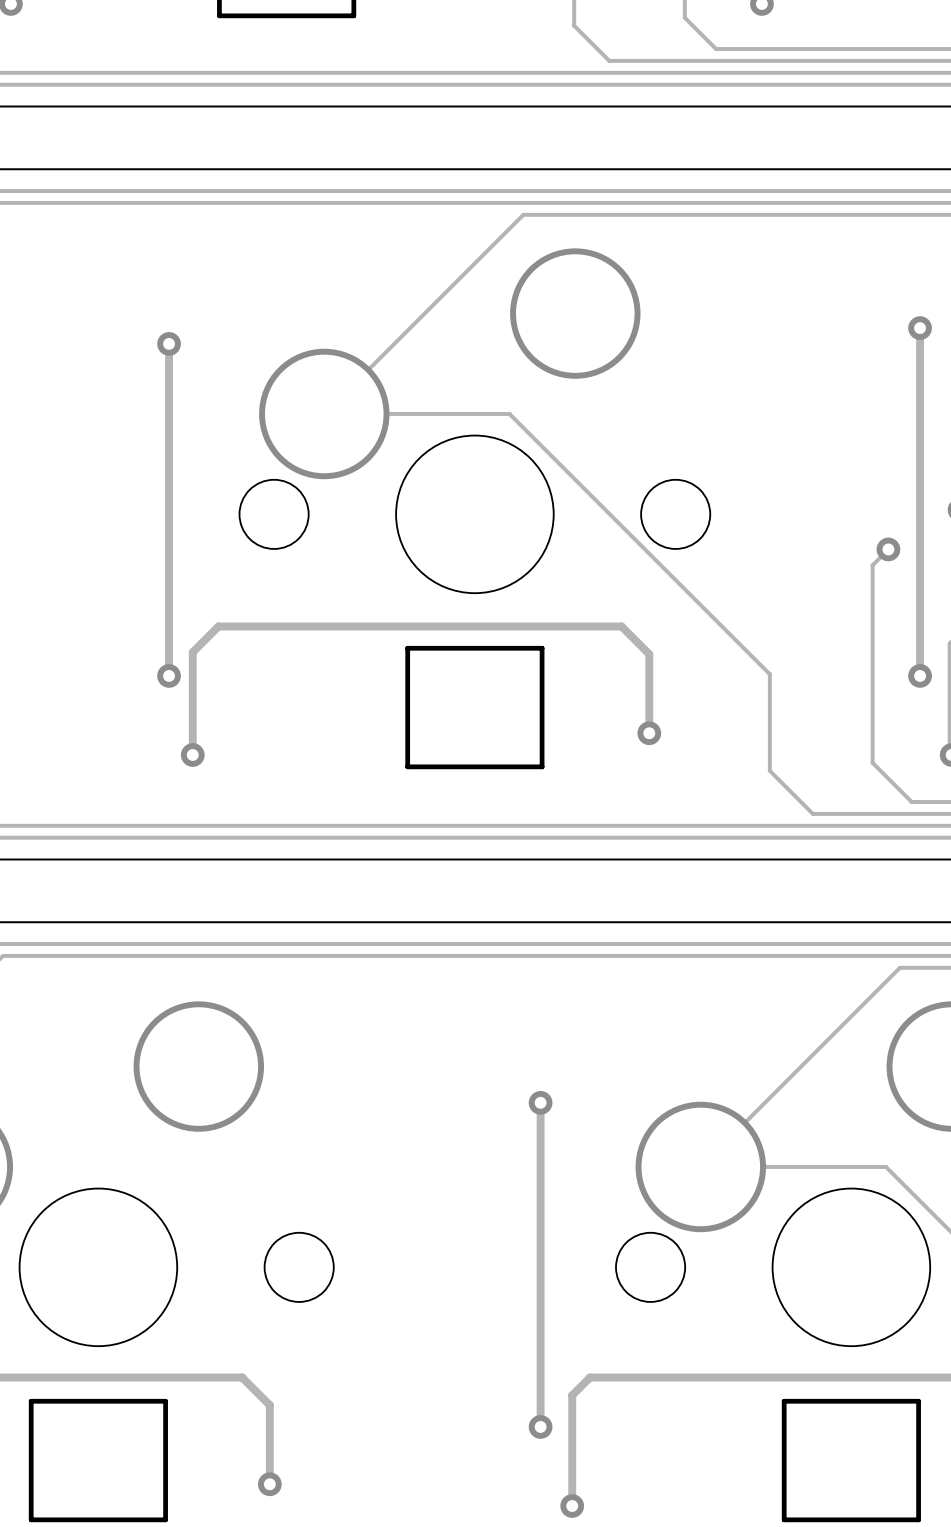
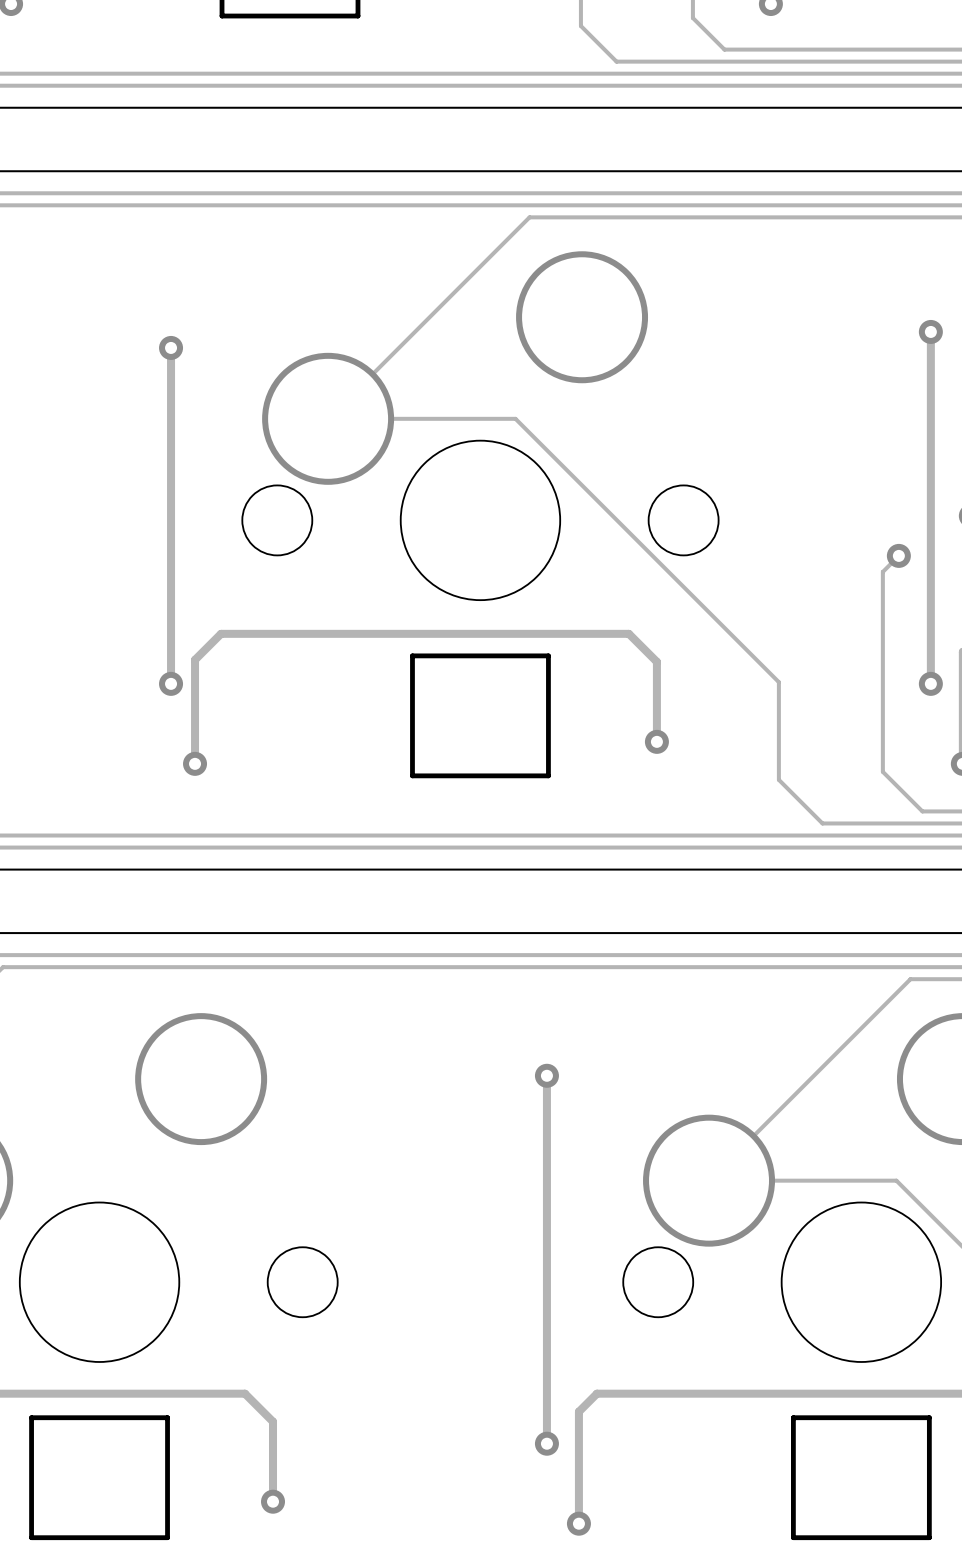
track: none -> (546, 1075) (546, 1115)
via position: (540, 1102) -> (546, 1075)

